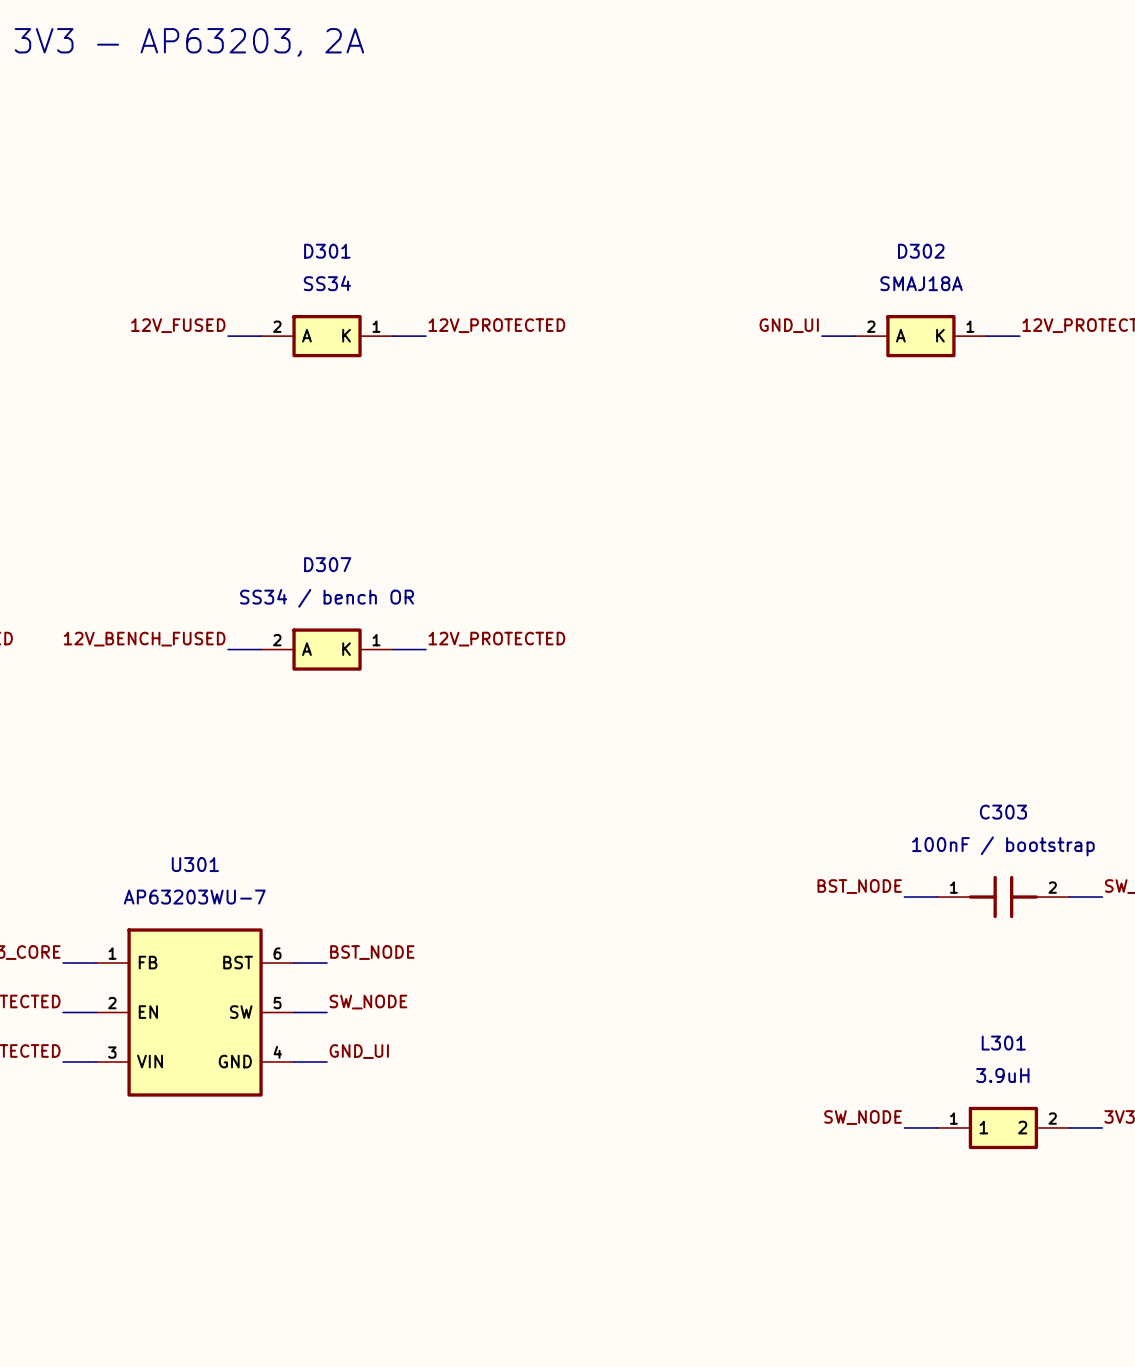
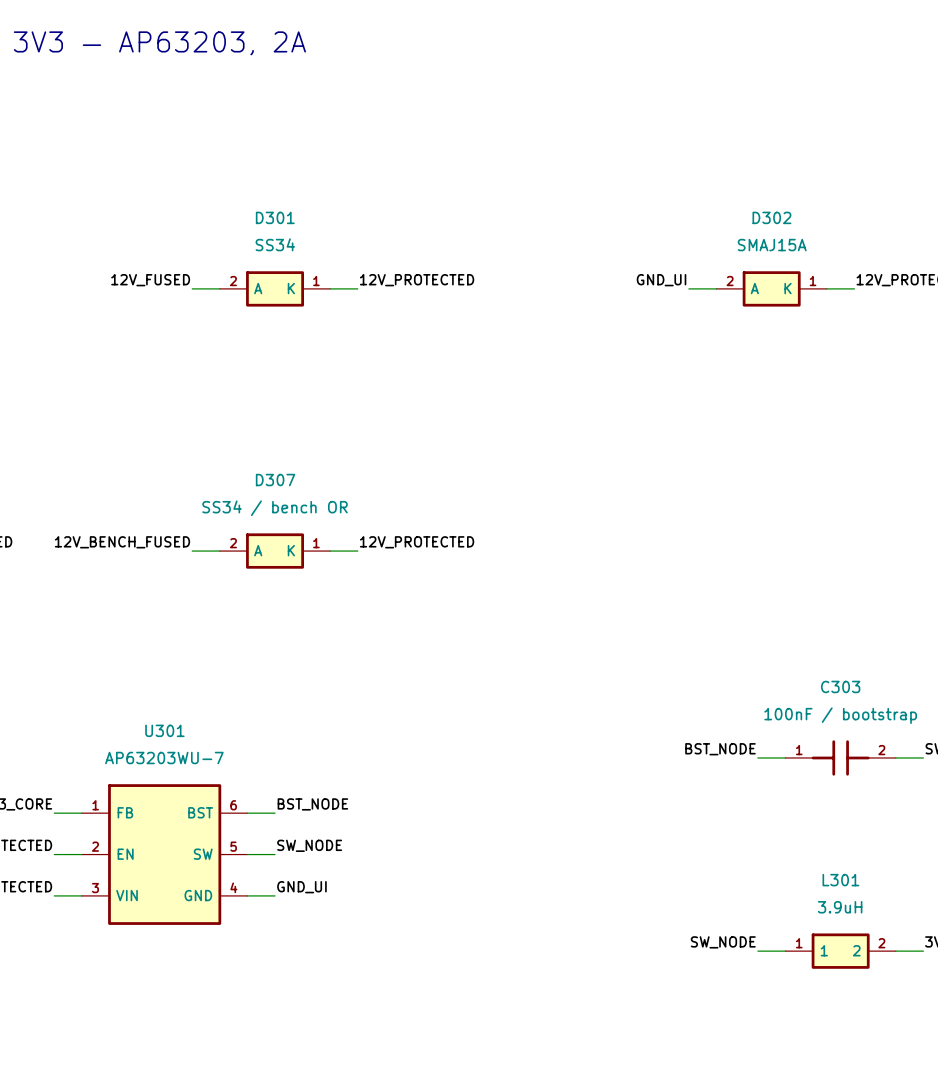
D302 value: SMAJ18A (921, 283) -> SMAJ15A (772, 245)

